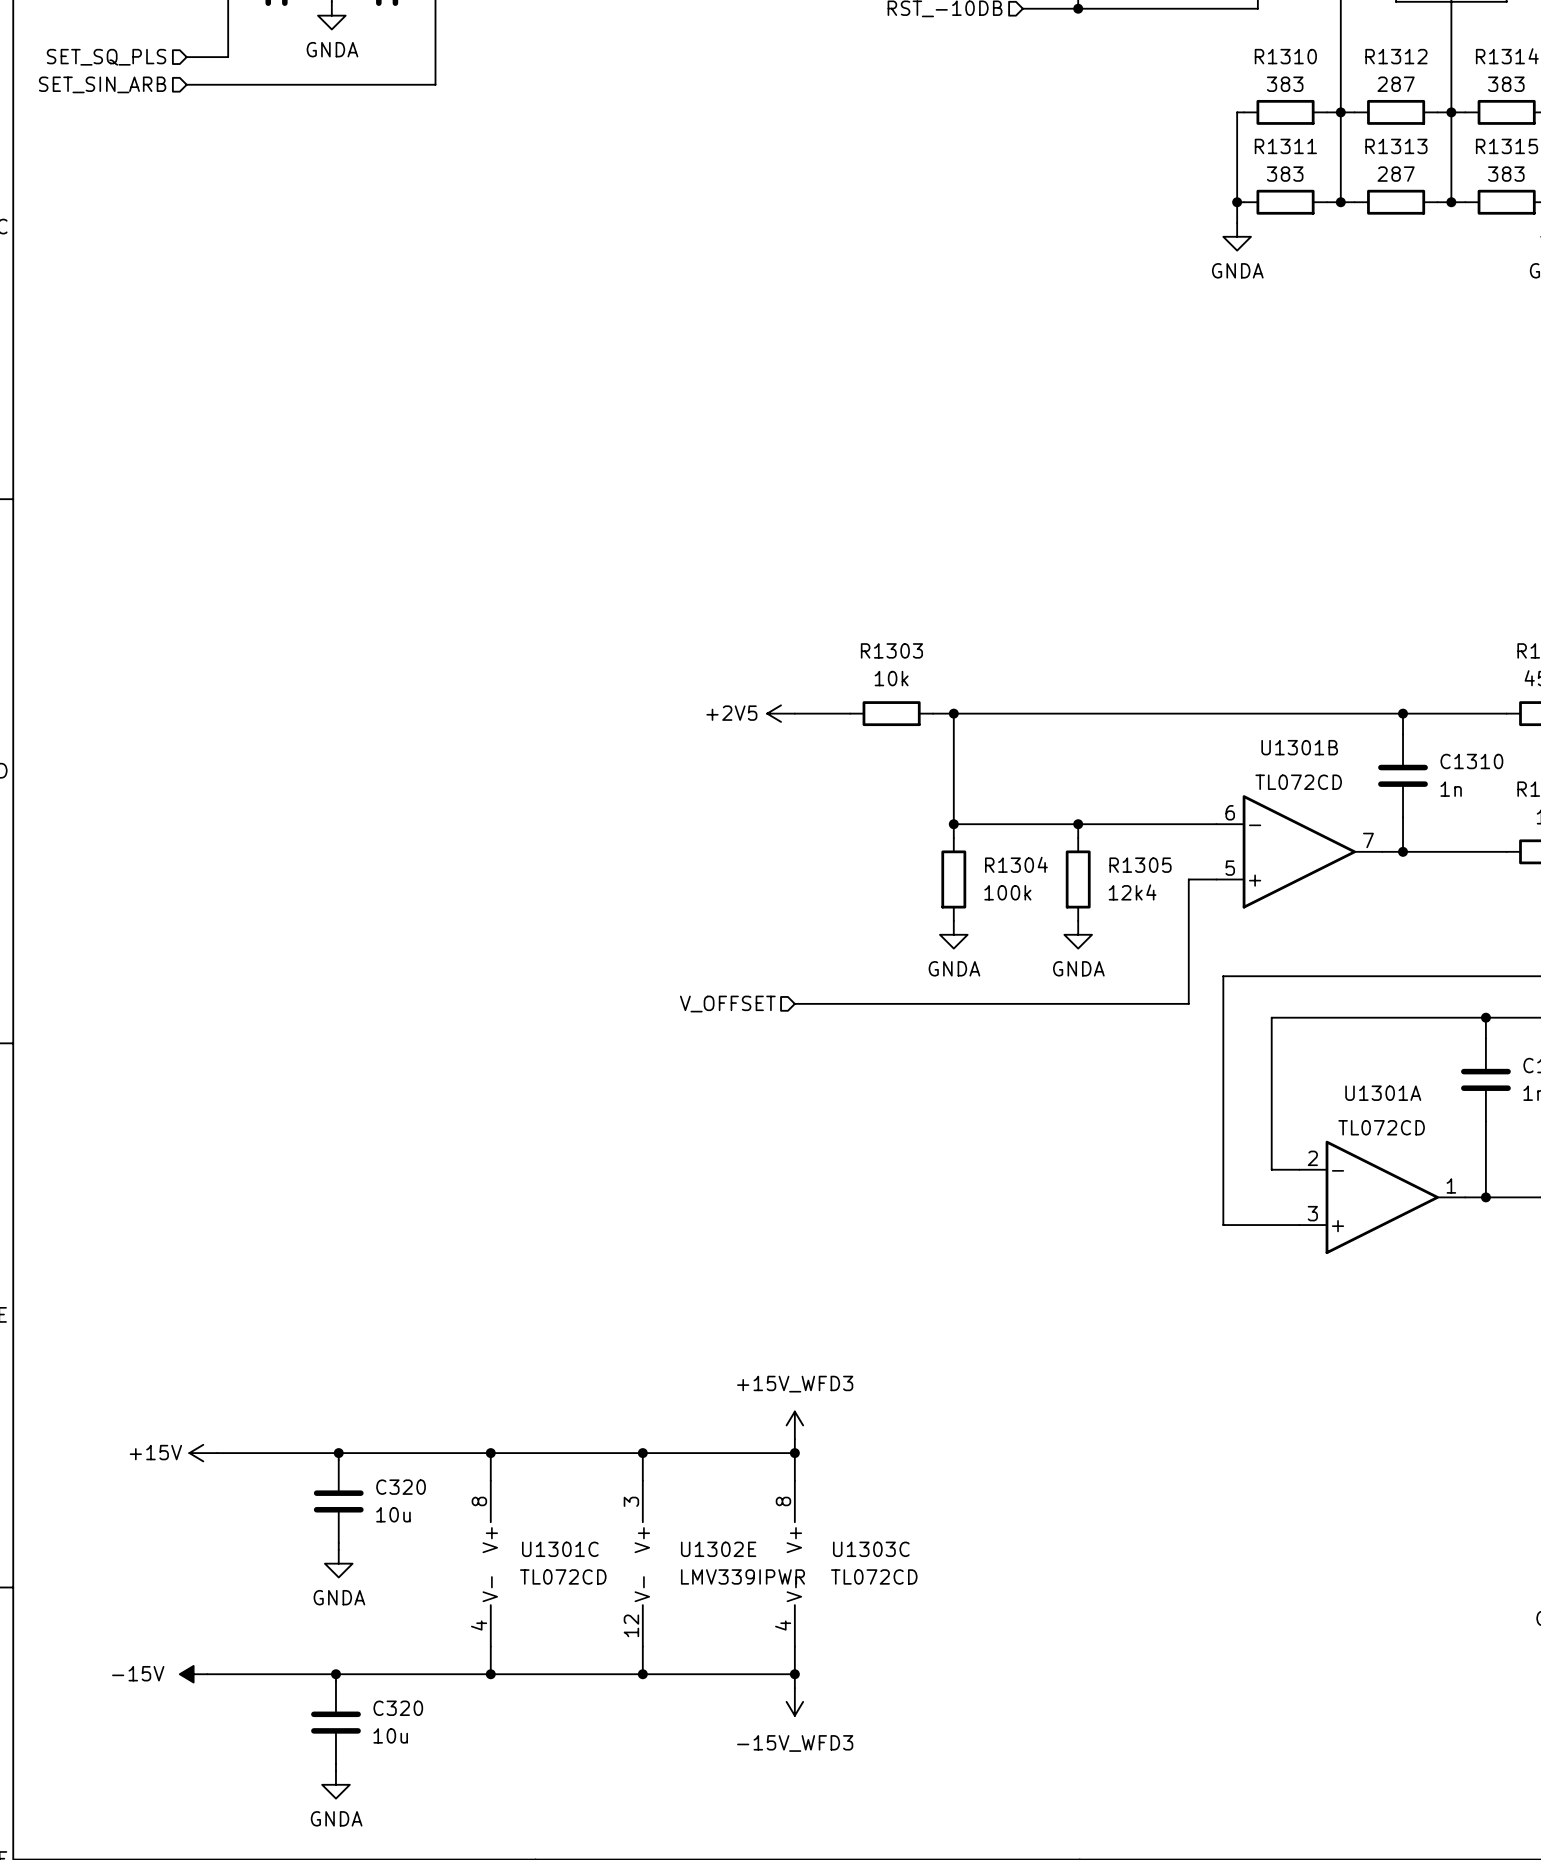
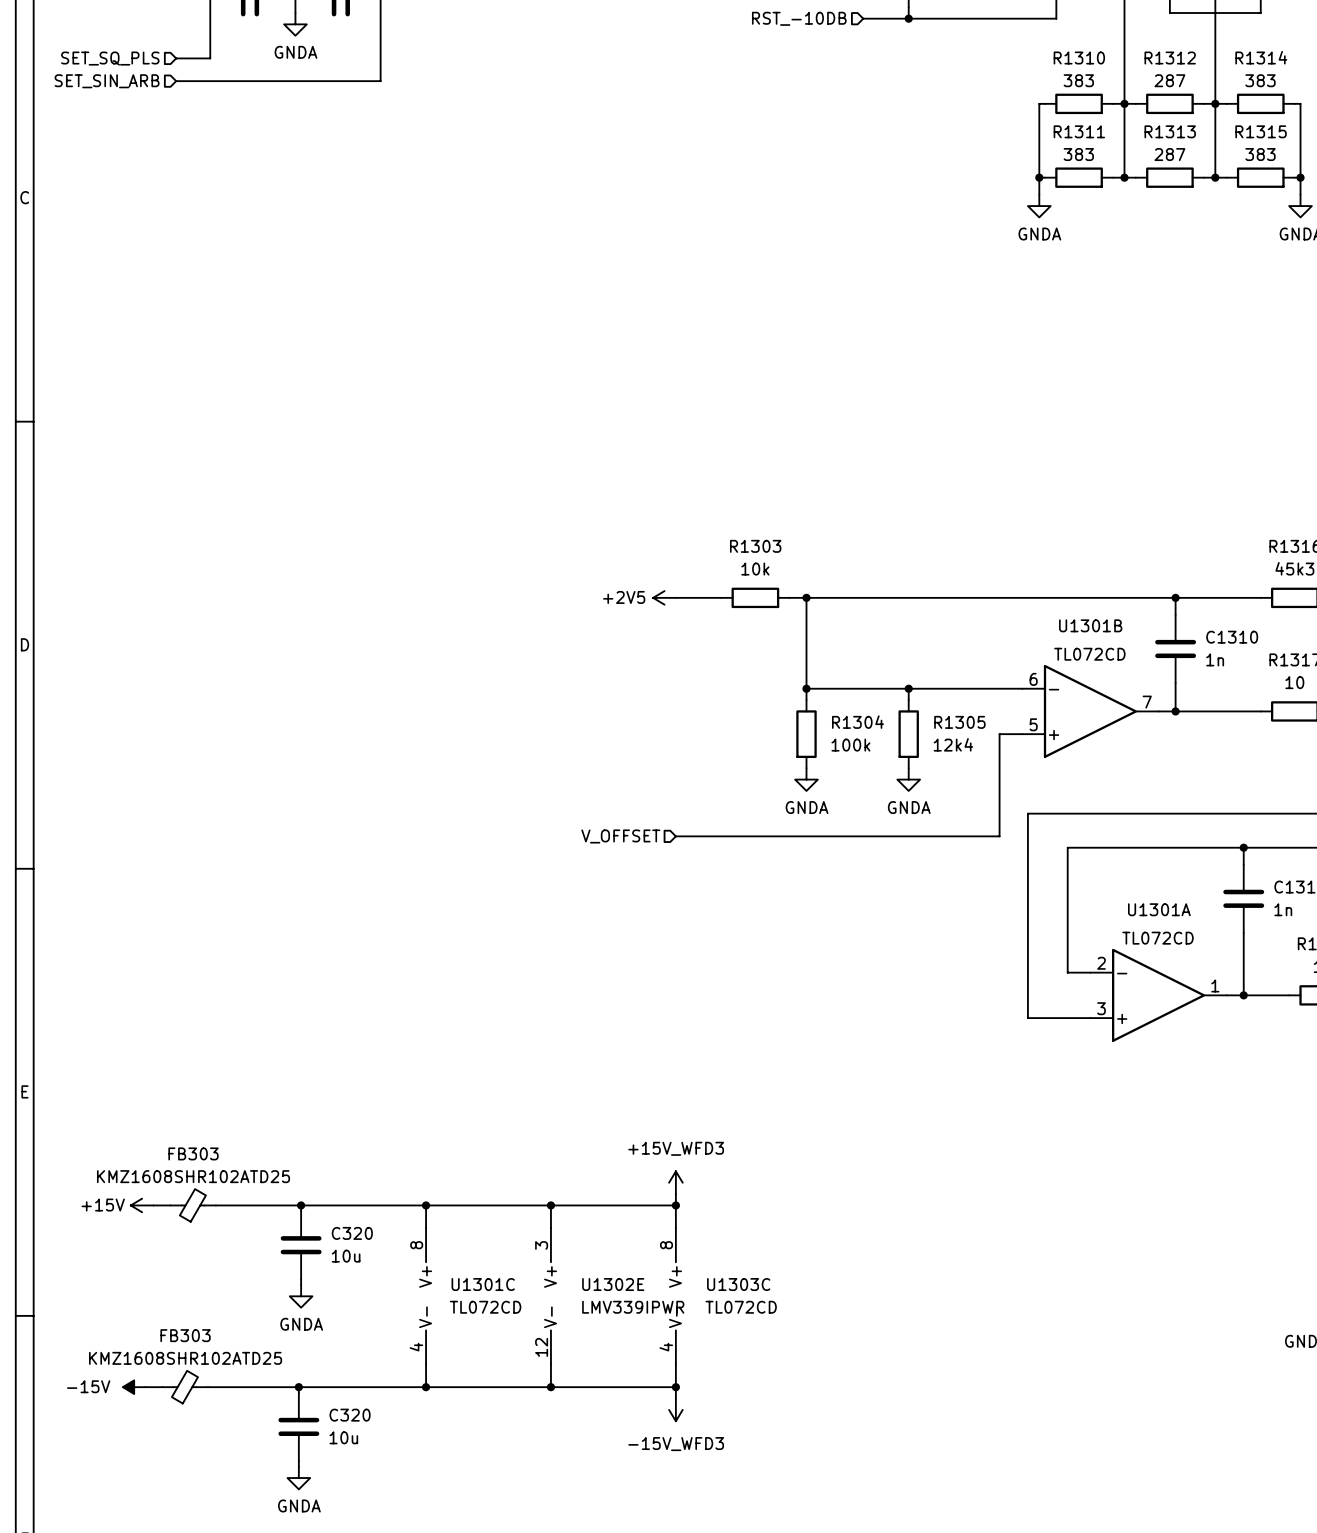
wire: none -> (153, 1205) (170, 1205)
power symbol position: +15V (203, 1453) -> +15V (142, 1205)
FB303: none -> KMZ1608SHR102ATD25 (193, 1205)
wire: none -> (145, 1387) (162, 1387)
power symbol position: -15V (193, 1674) -> -15V (134, 1387)
FB303: none -> KMZ1608SHR102ATD25 (185, 1387)

